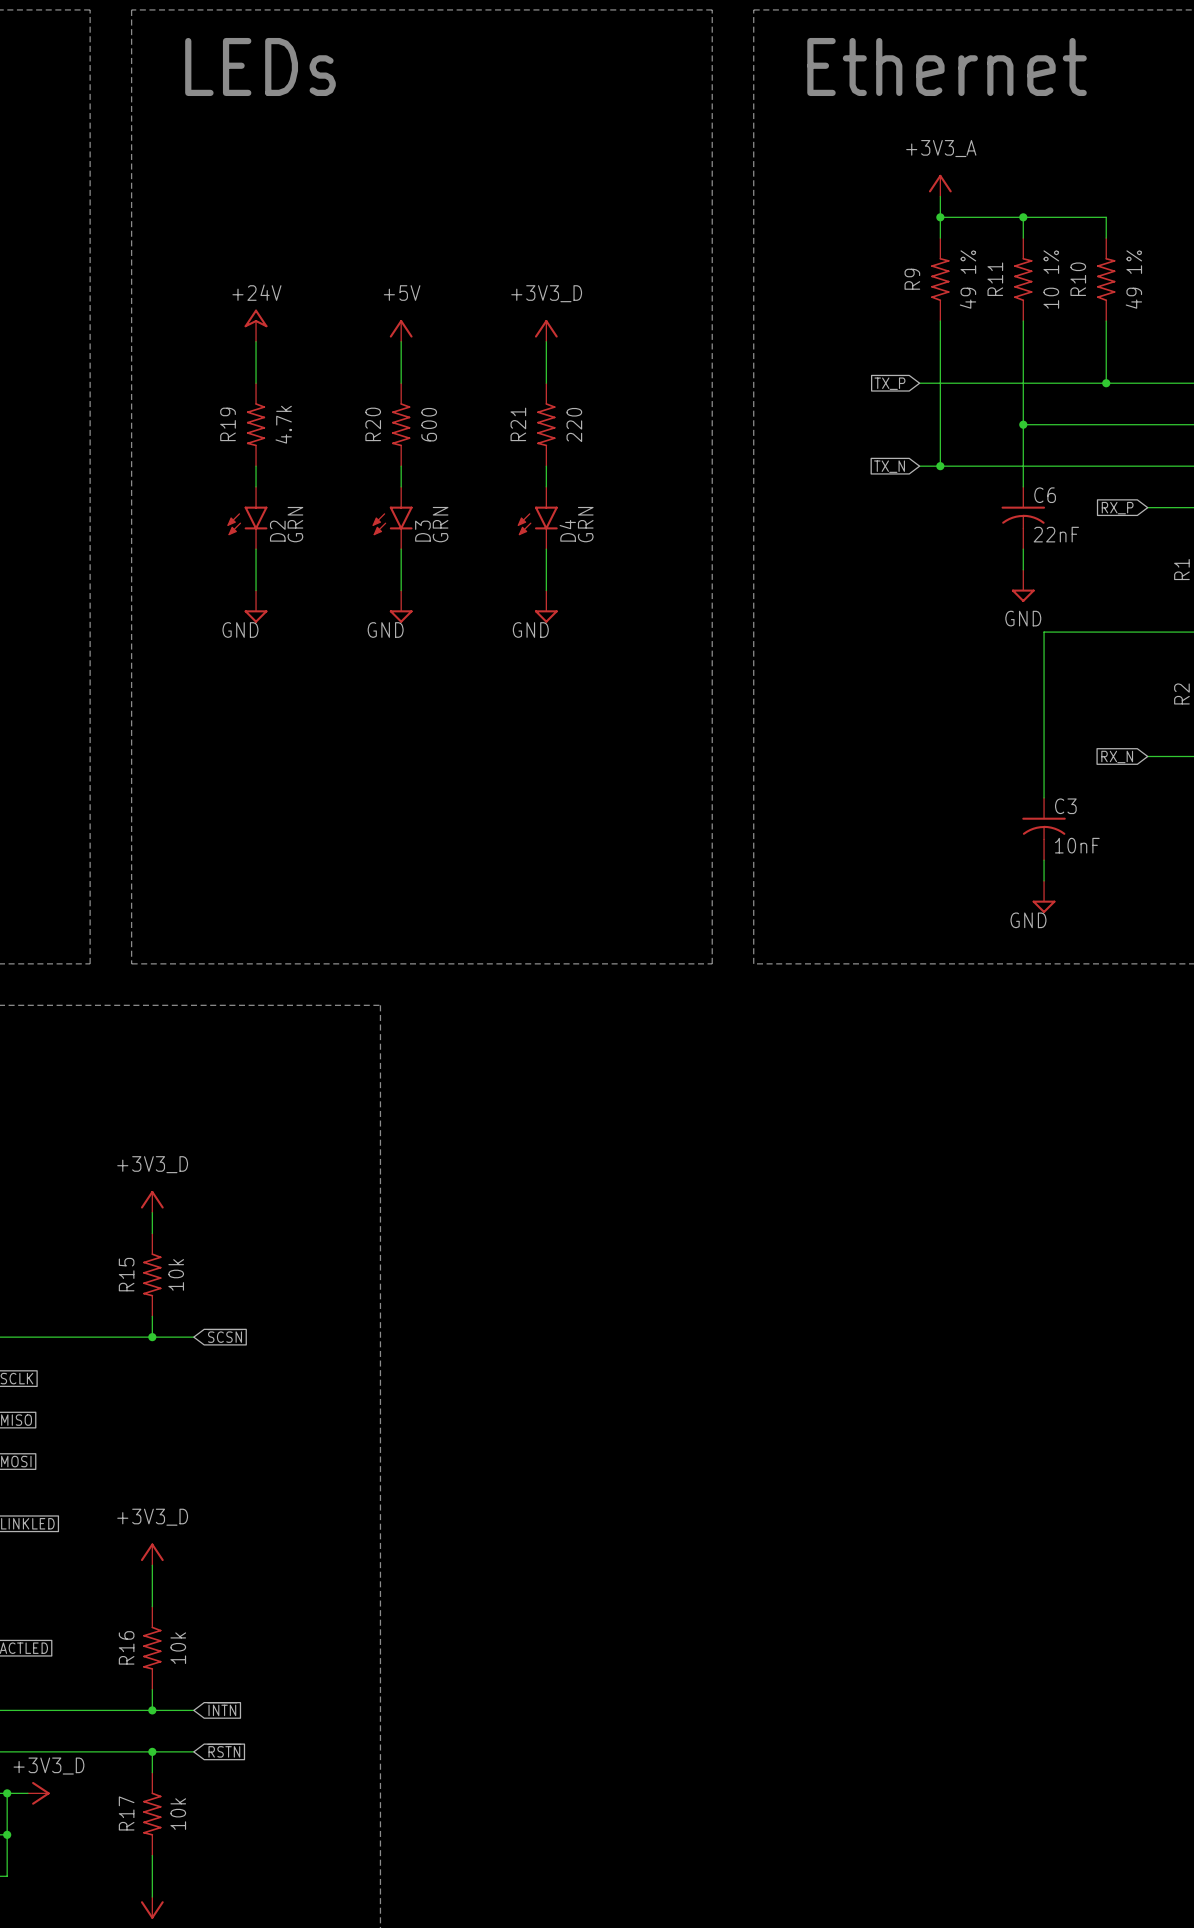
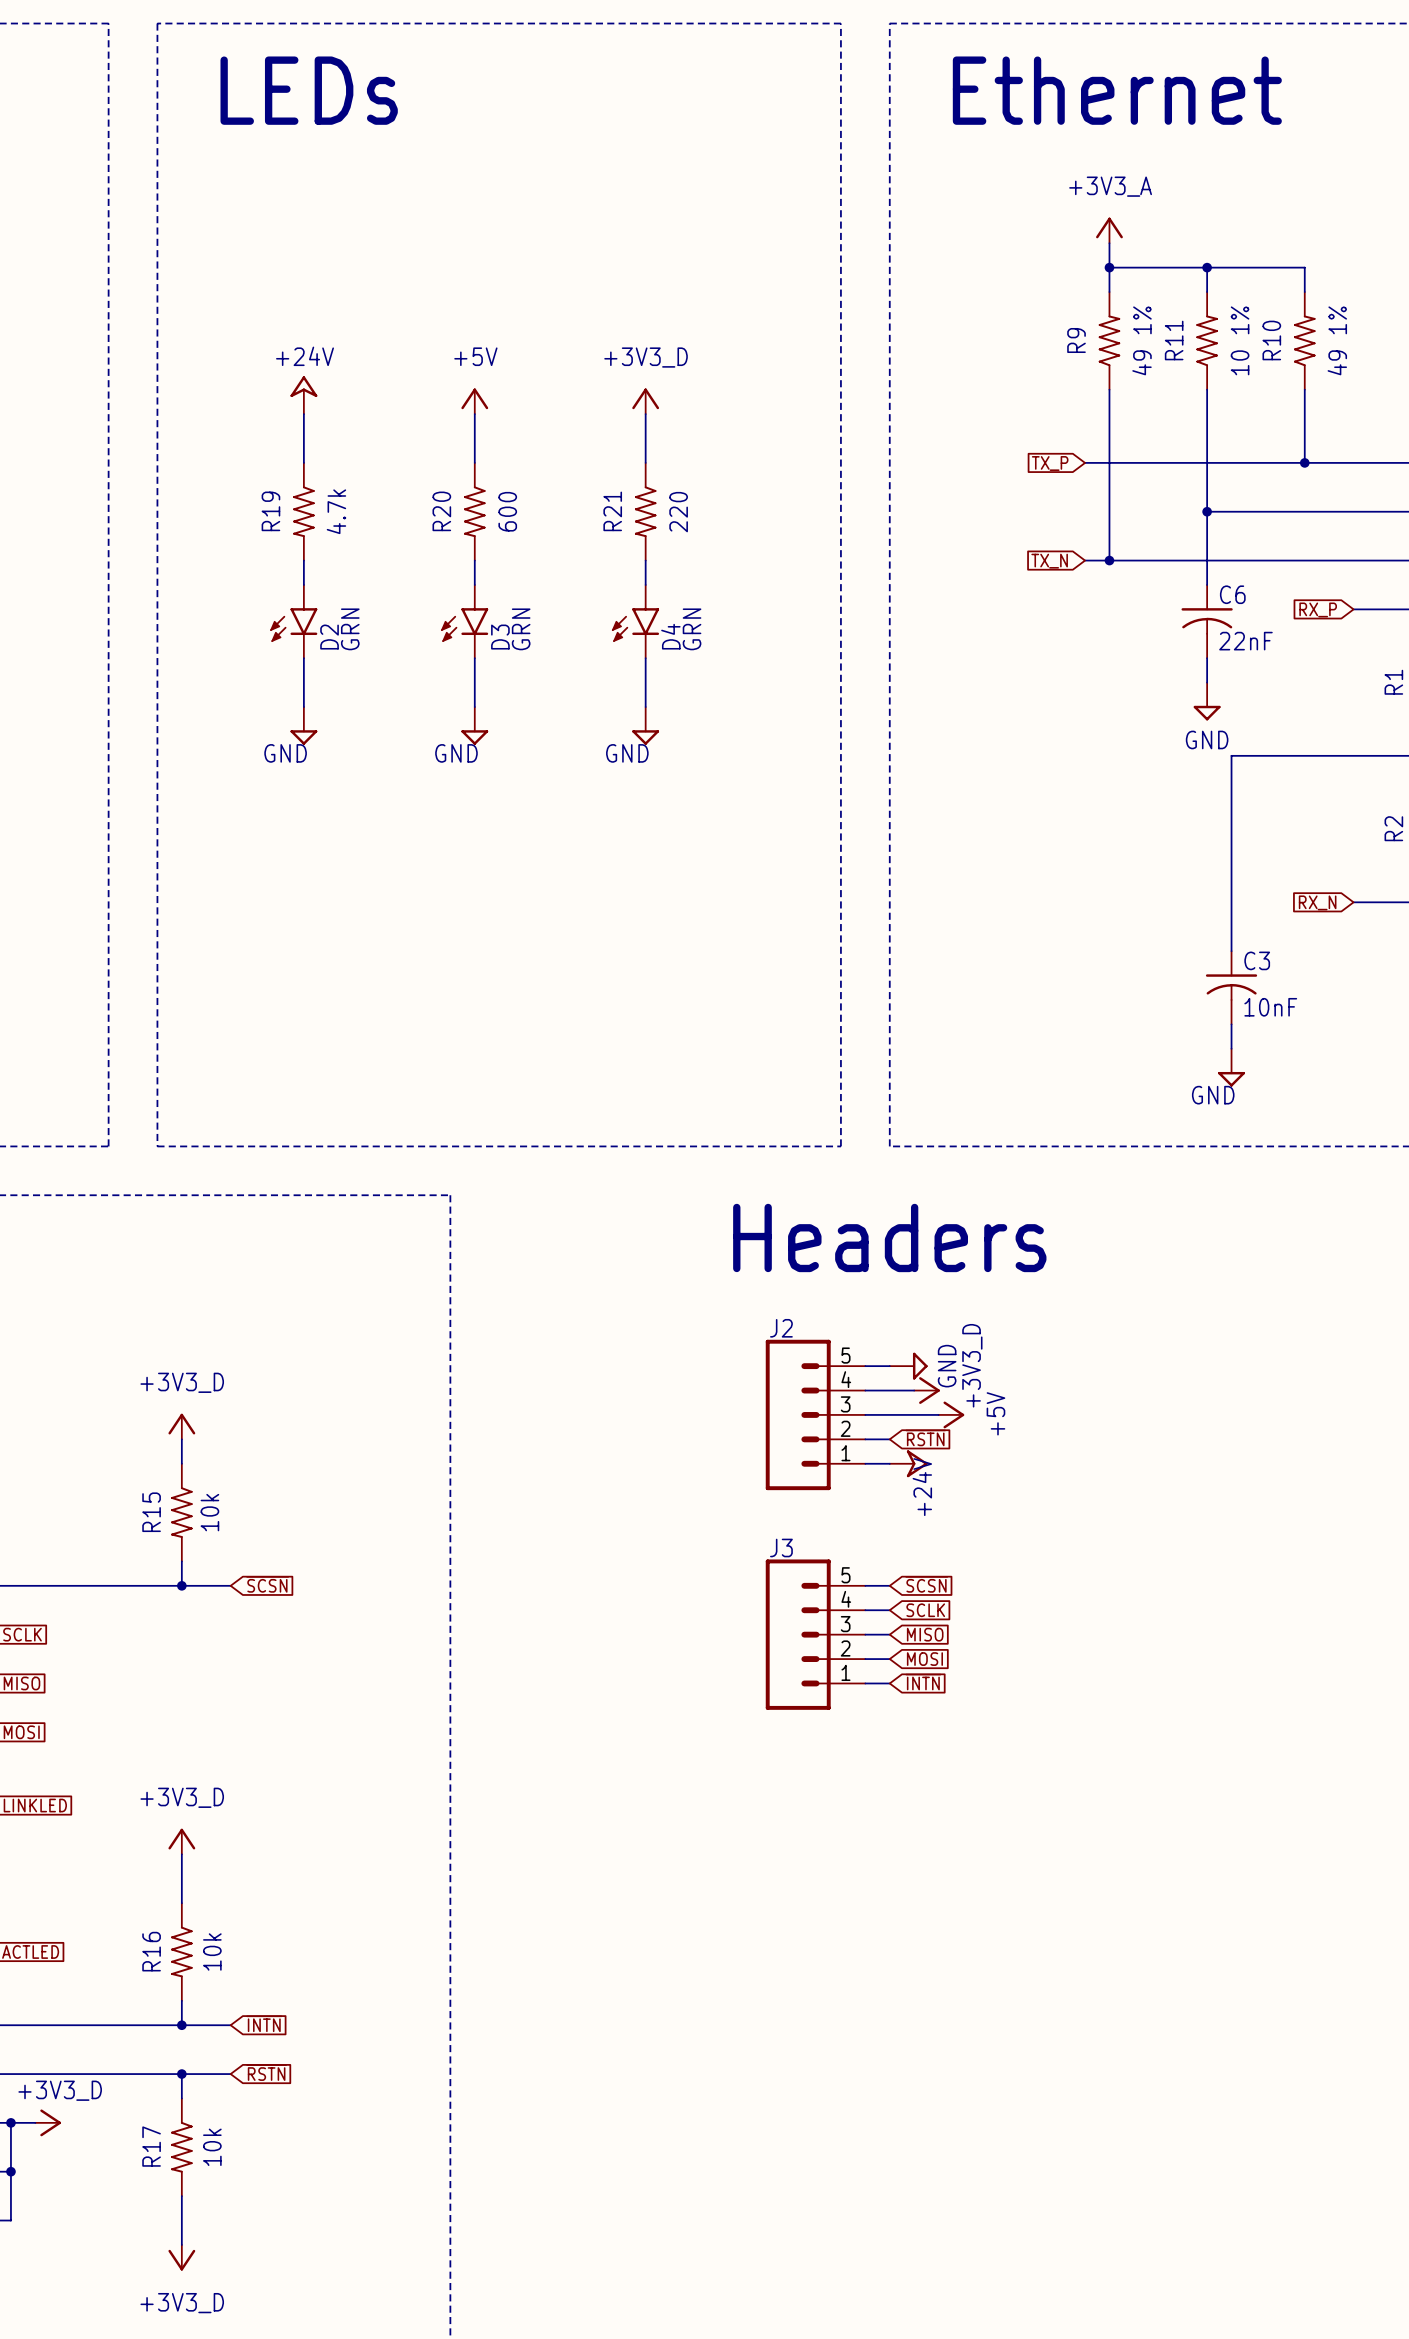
text: none -> Headers (889, 1237)
wire: none -> (865, 1366) (889, 1366)
power symbol: none -> GND (908, 1366)
wire: none -> (865, 1390) (914, 1390)
power symbol: none -> +3V3_D (927, 1390)
J2: none -> (815, 1414)
wire: none -> (865, 1414) (938, 1414)
power symbol: none -> +5V (951, 1414)
global label: none -> ~{RSTN} (925, 1437)
wire: none -> (865, 1439) (889, 1439)
wire: none -> (865, 1463) (889, 1463)
power symbol: none -> +24V (908, 1463)
global label: none -> ~{SCSN} (926, 1584)
wire: none -> (865, 1585) (889, 1585)
wire: none -> (865, 1610) (889, 1610)
global label: none -> SCLK (925, 1610)
J3: none -> (815, 1634)
wire: none -> (865, 1634) (889, 1634)
global label: none -> MISO (925, 1634)
wire: none -> (865, 1659) (889, 1659)
global label: none -> MOSI (924, 1659)
global label: none -> ~{INTN} (923, 1682)
wire: none -> (865, 1683) (889, 1683)

